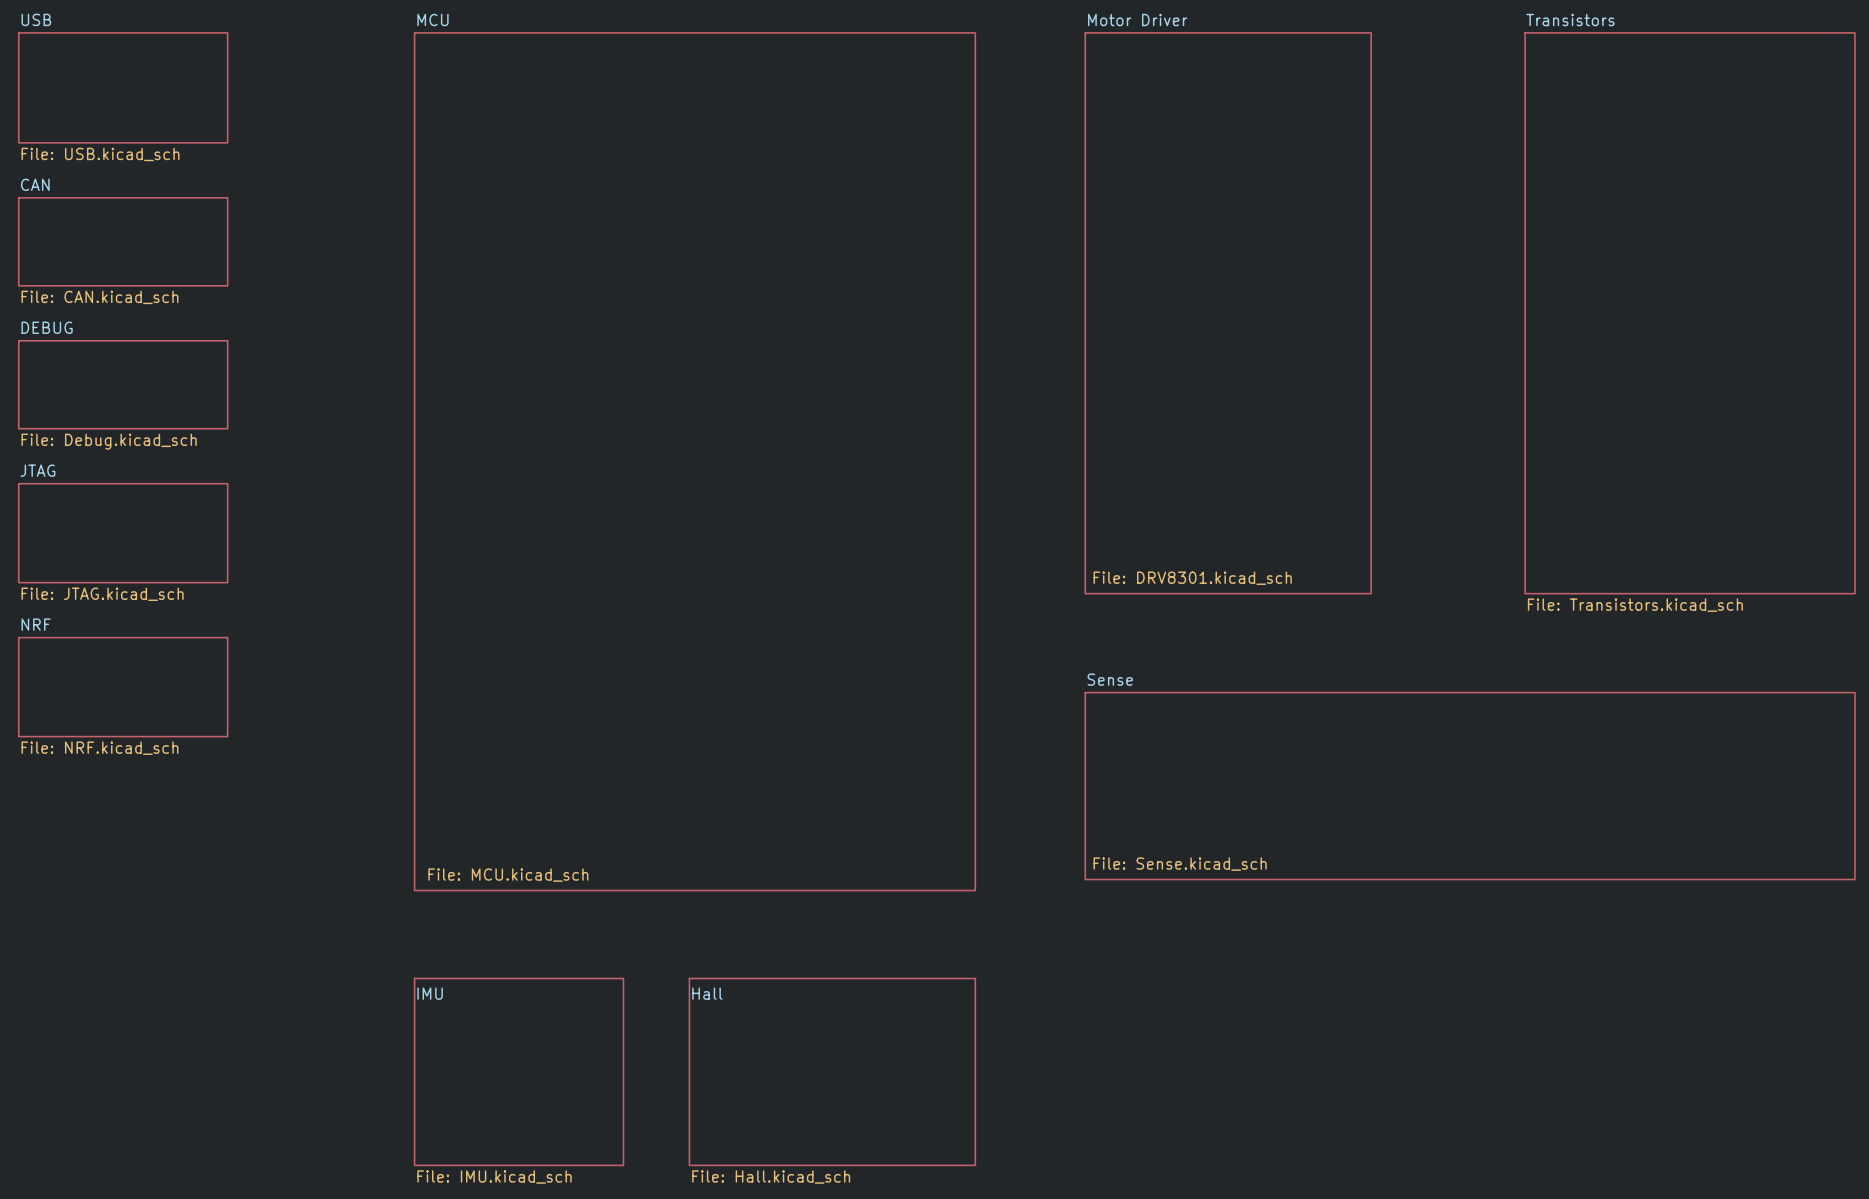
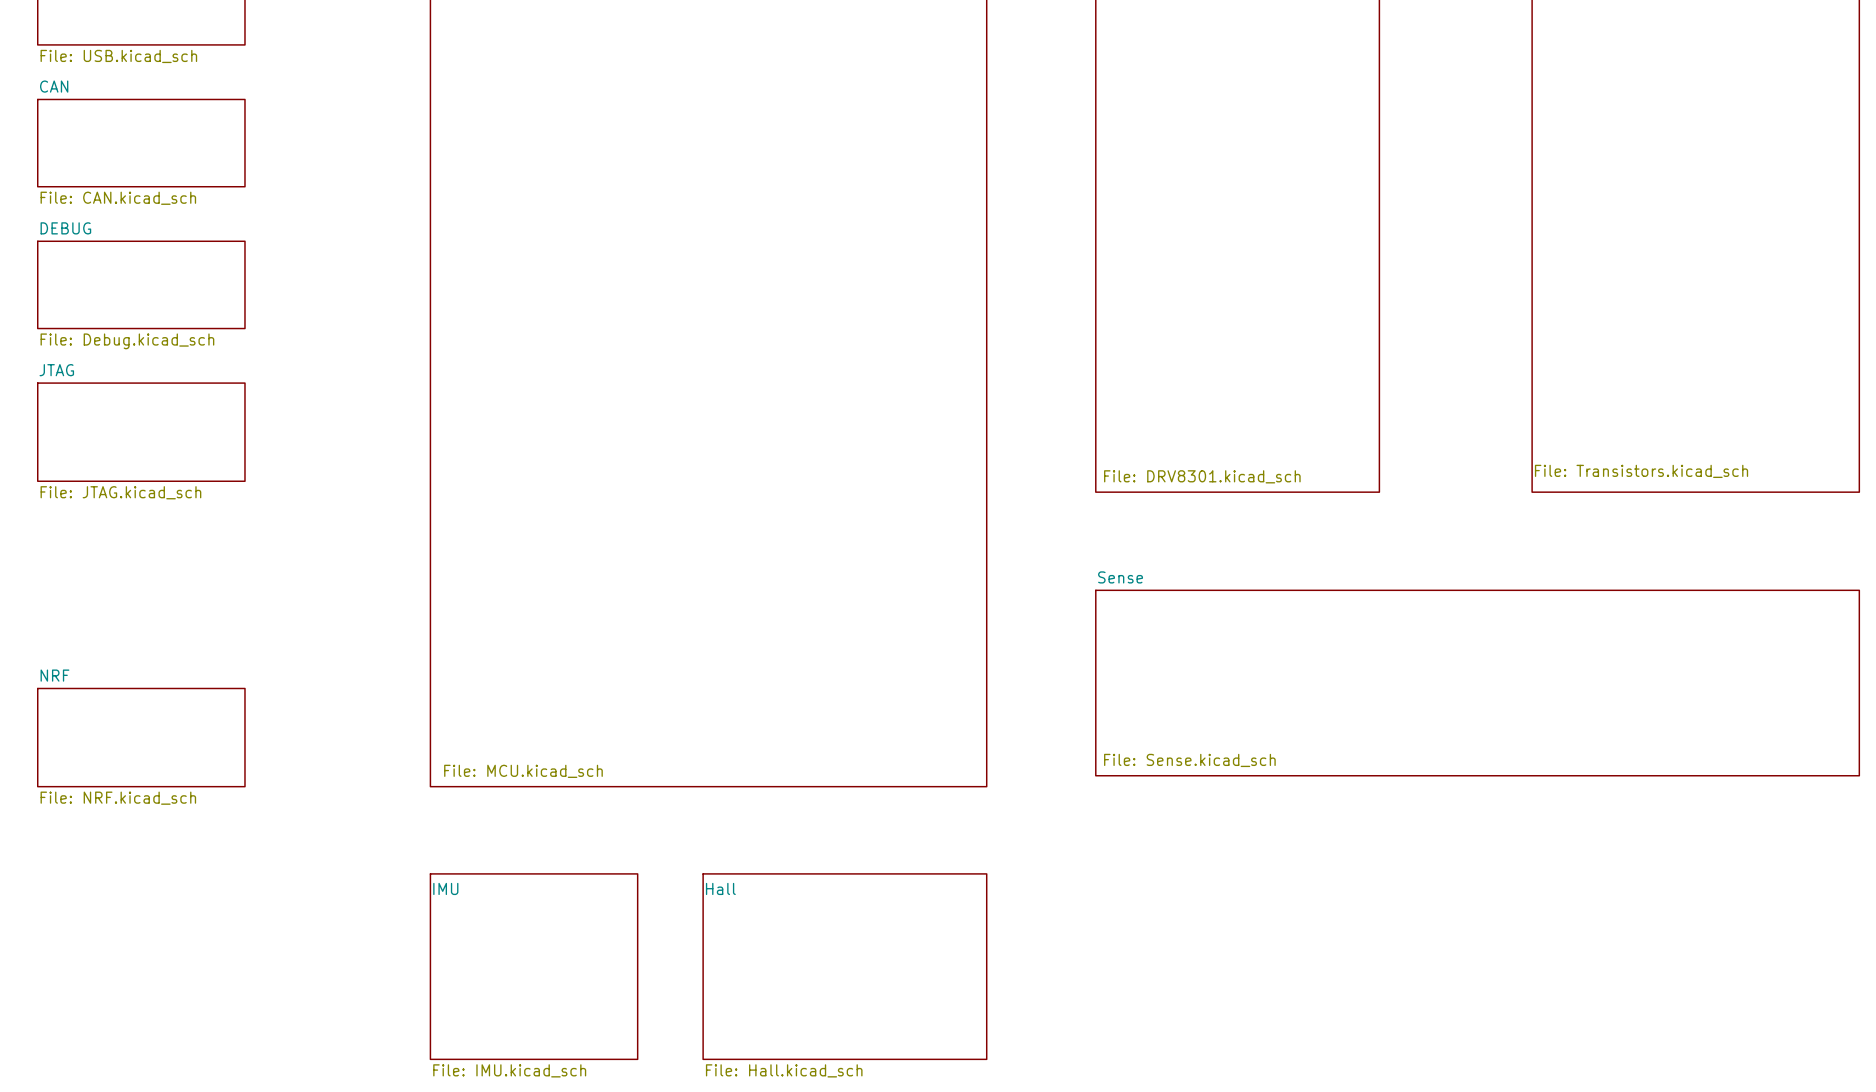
sheet Transistors value position: File: Transistors.kicad_sch (1635, 605) -> File: Transistors.kicad_sch (1641, 471)
sheet NRF position: (123, 687) -> (141, 737)

